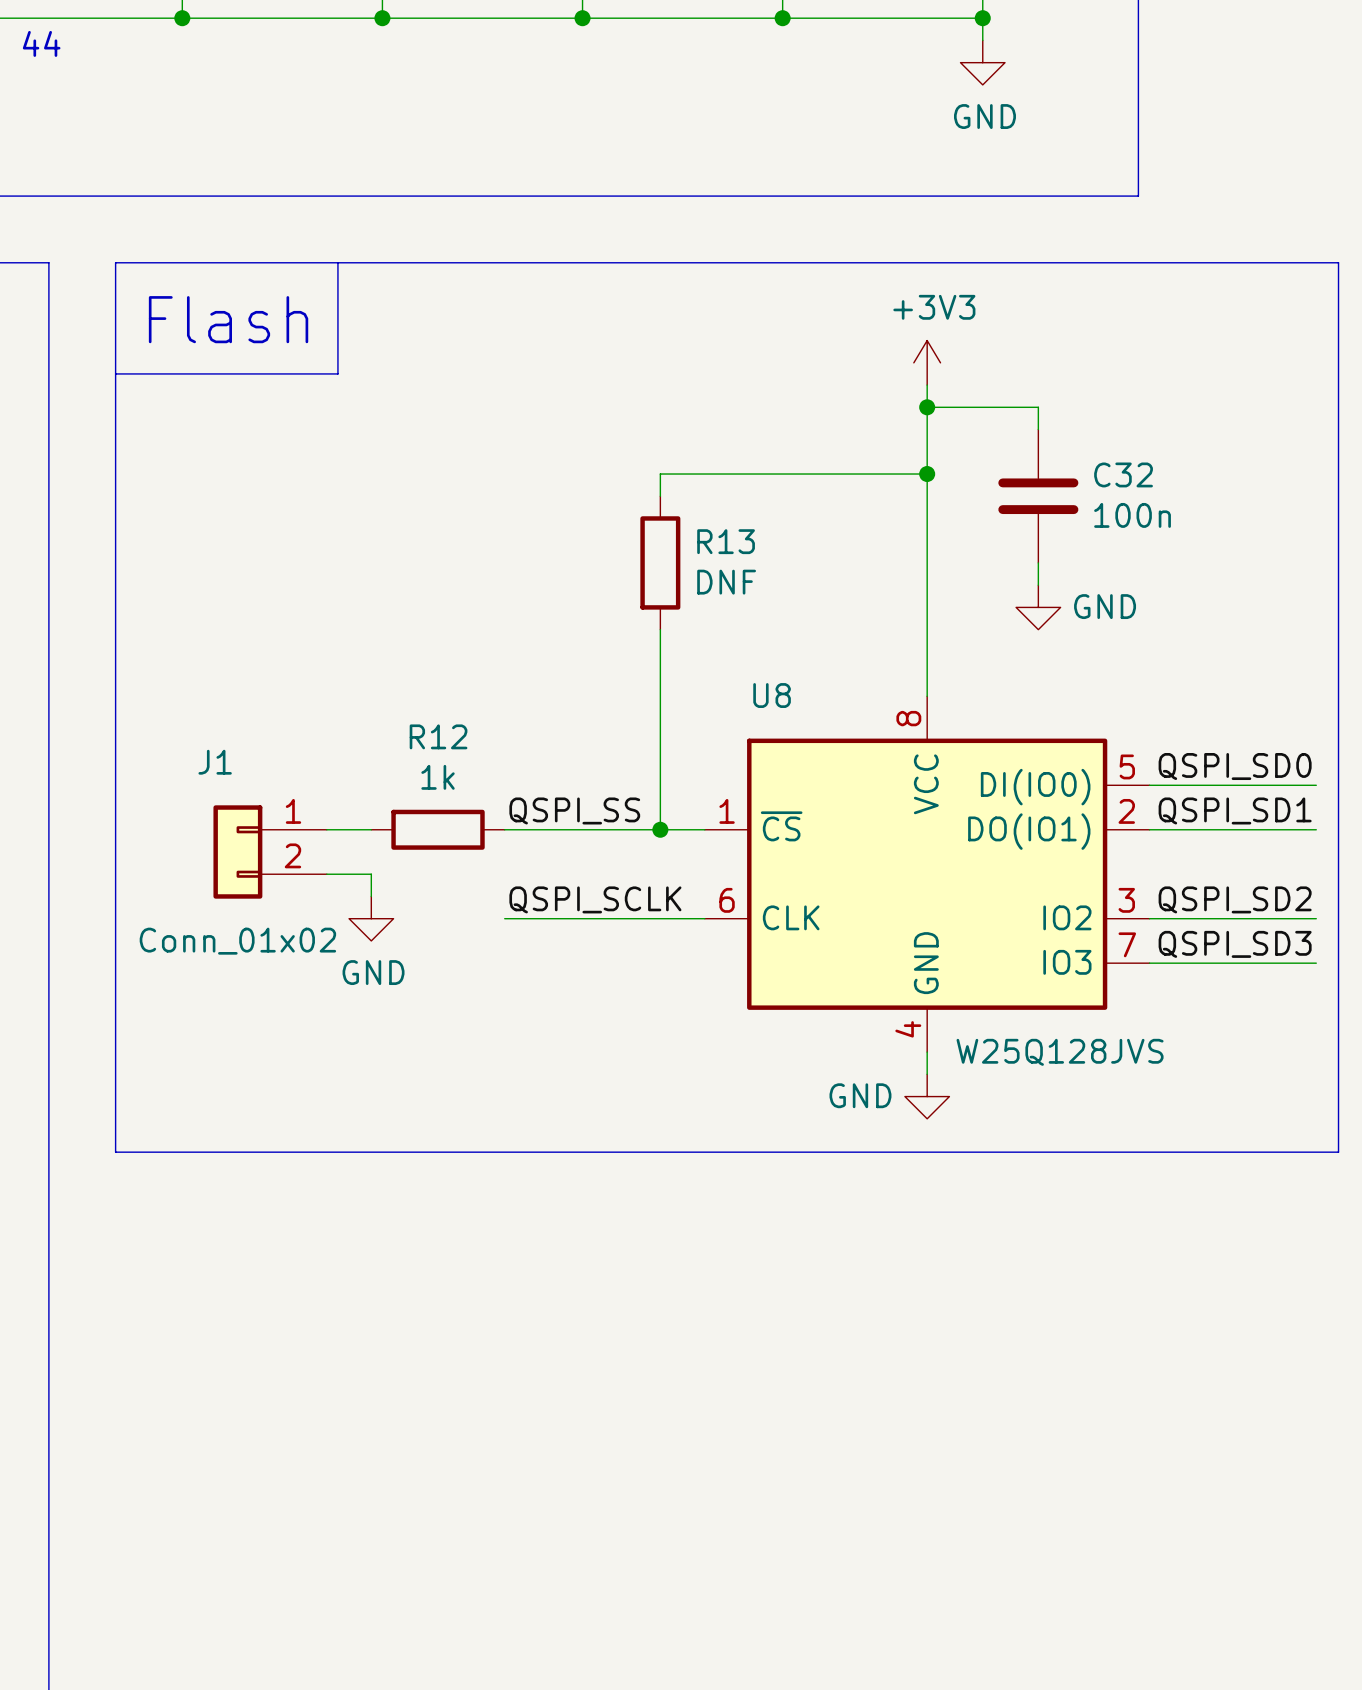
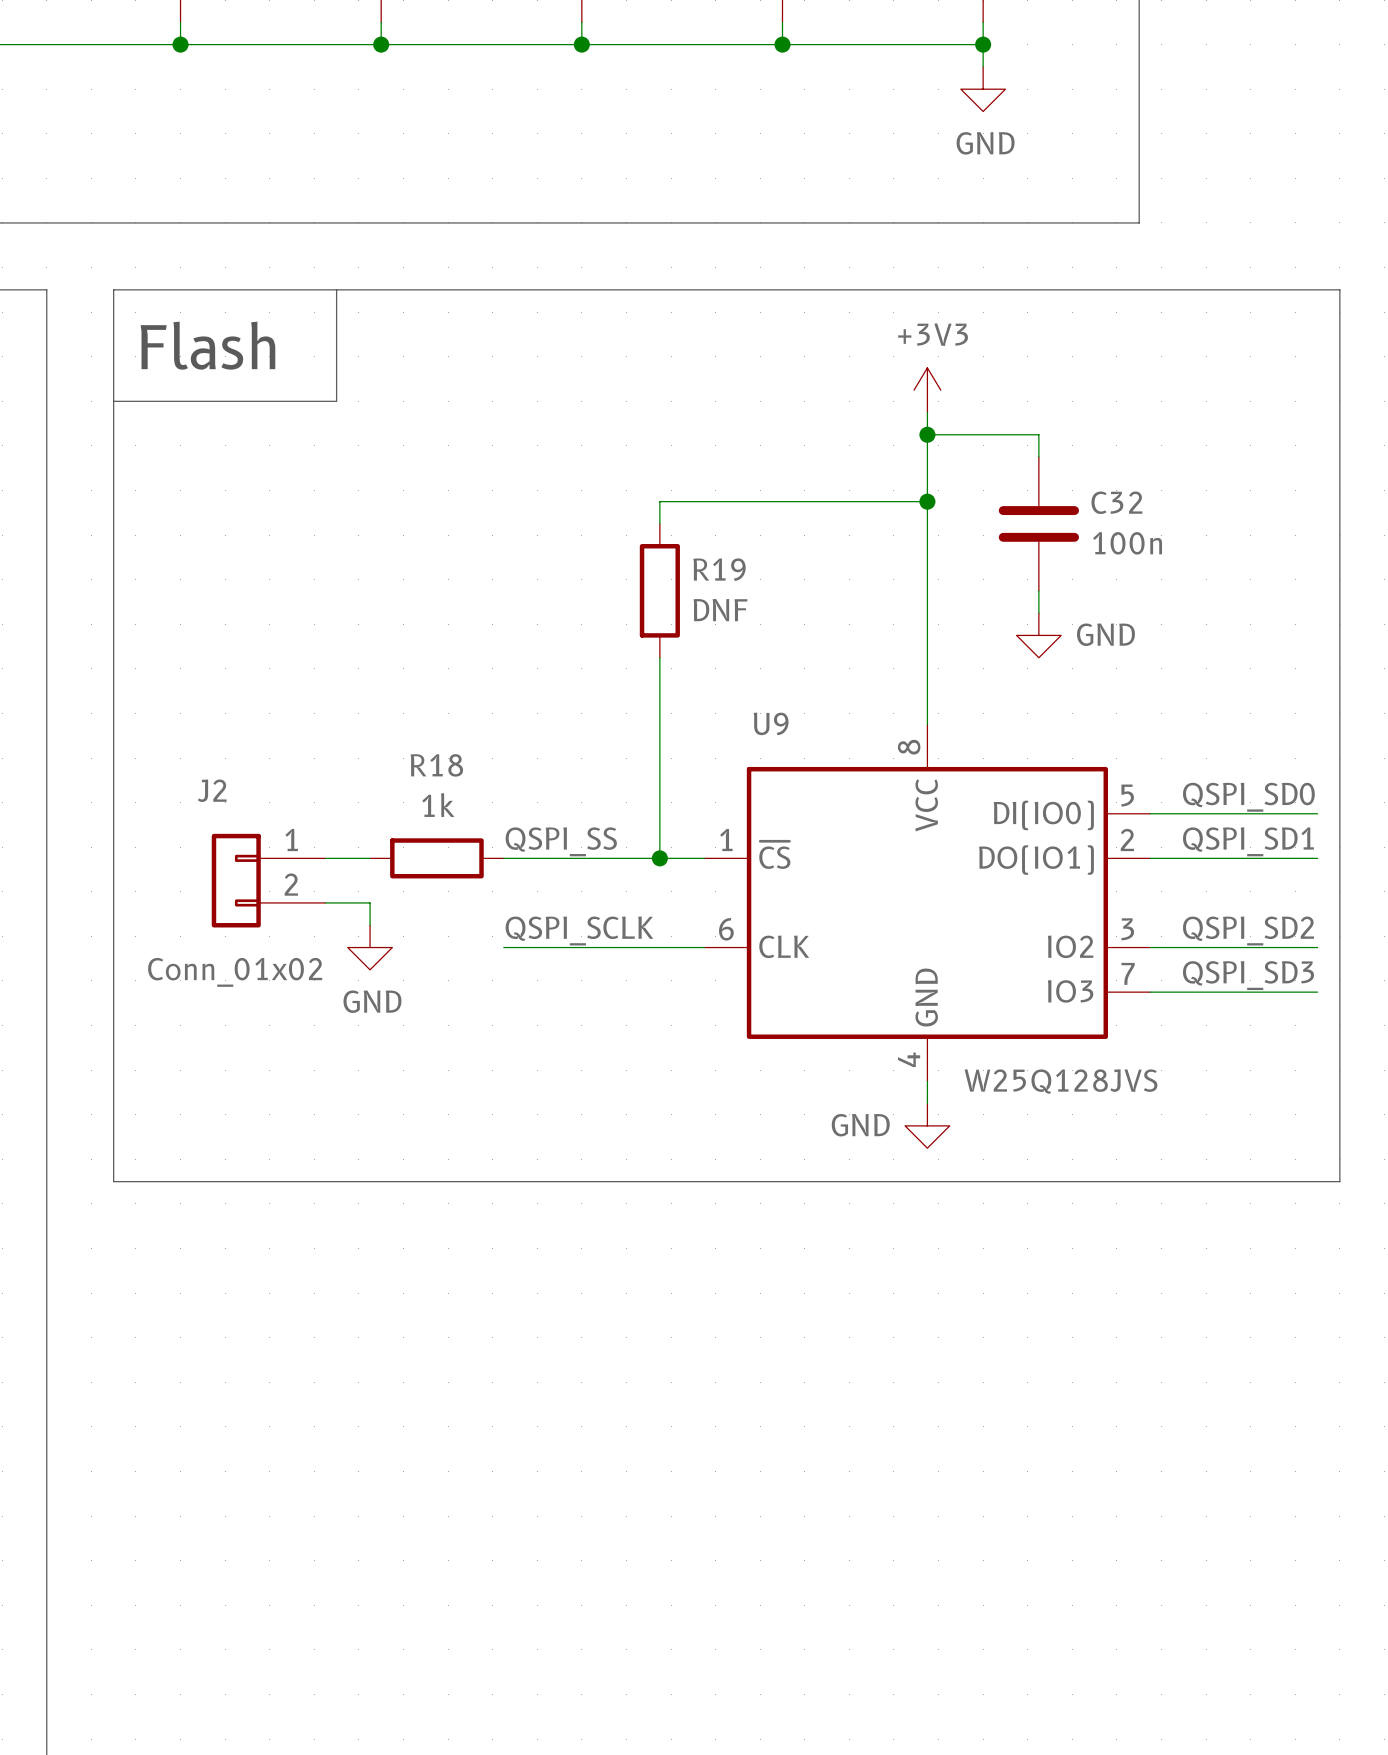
R13 name: R13 (726, 541) -> R19 (719, 569)
U8 name: U8 (772, 695) -> U9 (771, 723)
R12 name: R12 (438, 736) -> R18 (436, 765)
J1 name: J1 (215, 762) -> J2 (212, 790)

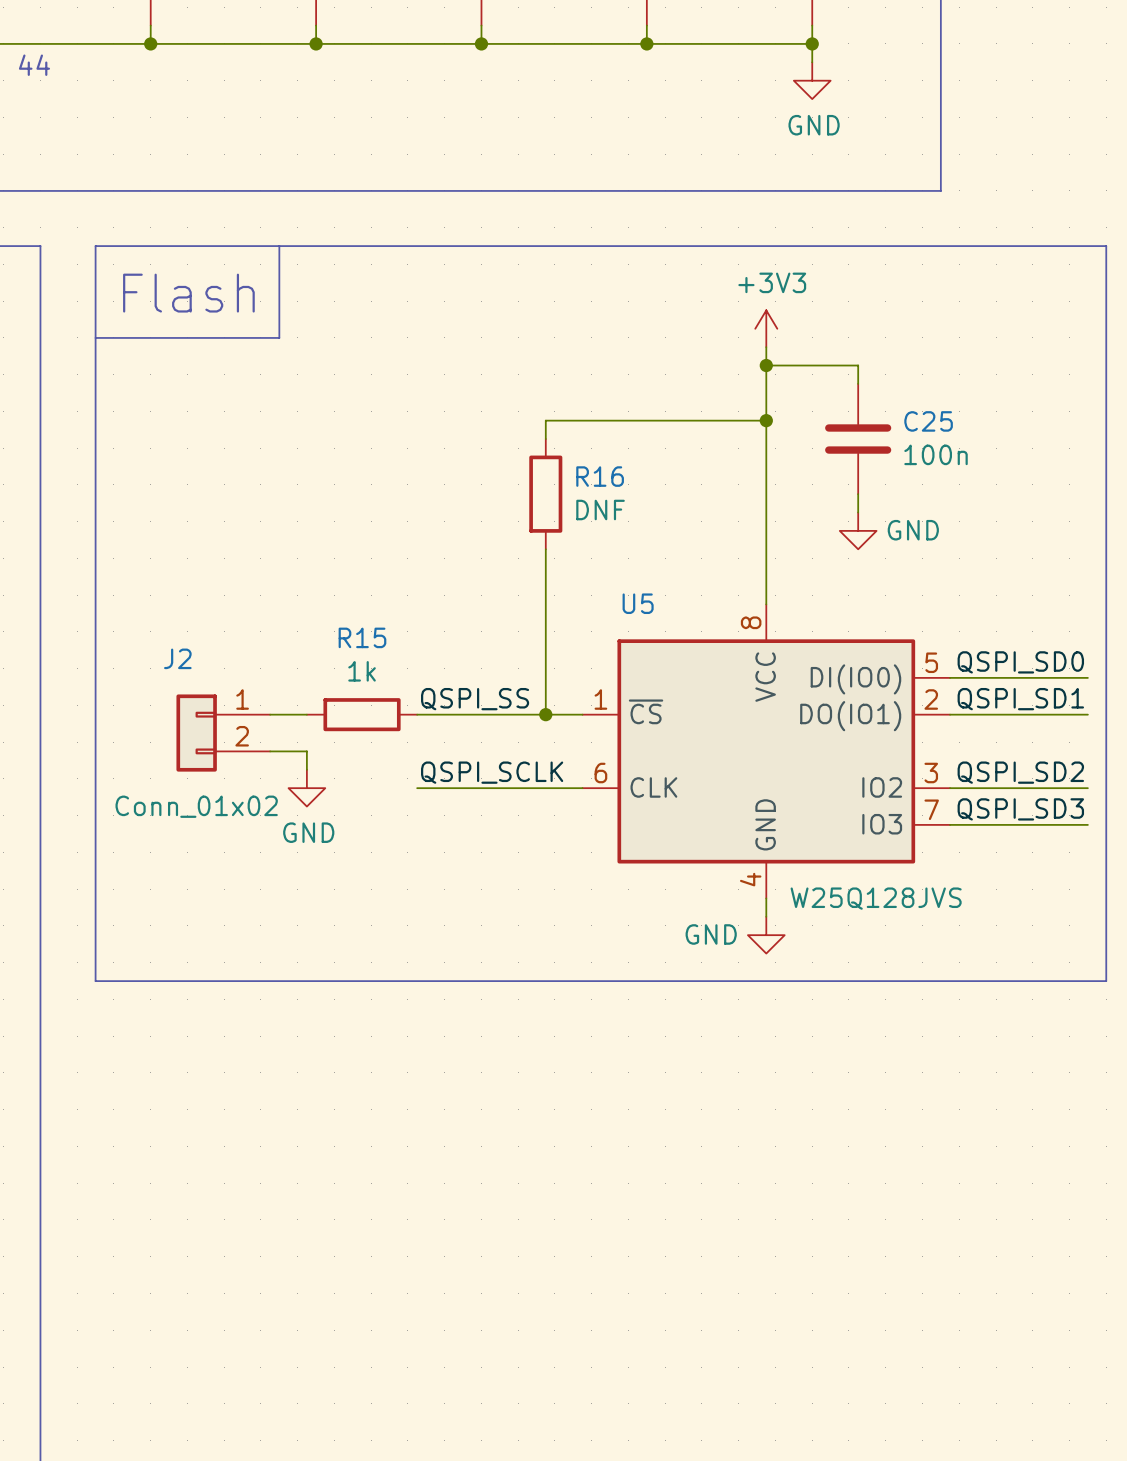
C32 name: C32 (1116, 502) -> C25 (928, 421)
R19 name: R19 (719, 569) -> R16 (600, 476)
U9 name: U9 (771, 723) -> U5 (638, 603)
R18 name: R18 (436, 765) -> R15 (362, 637)

